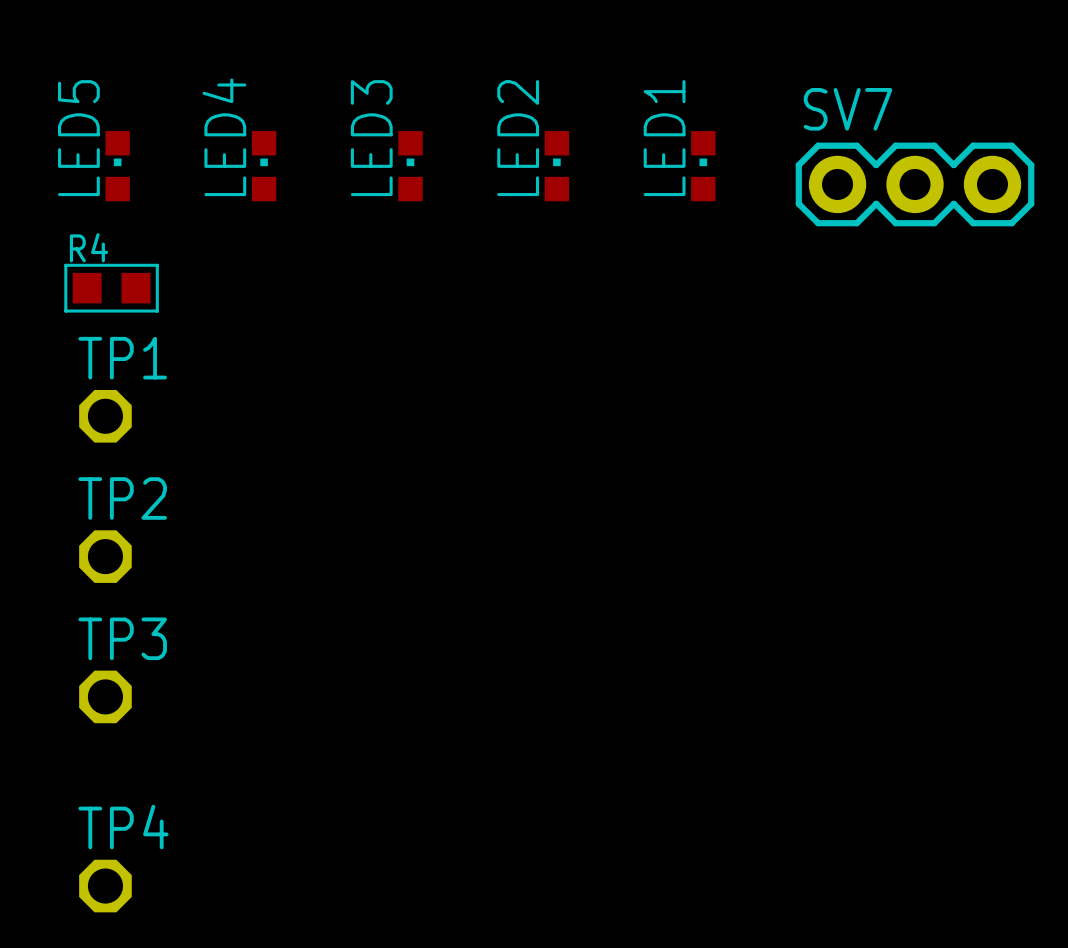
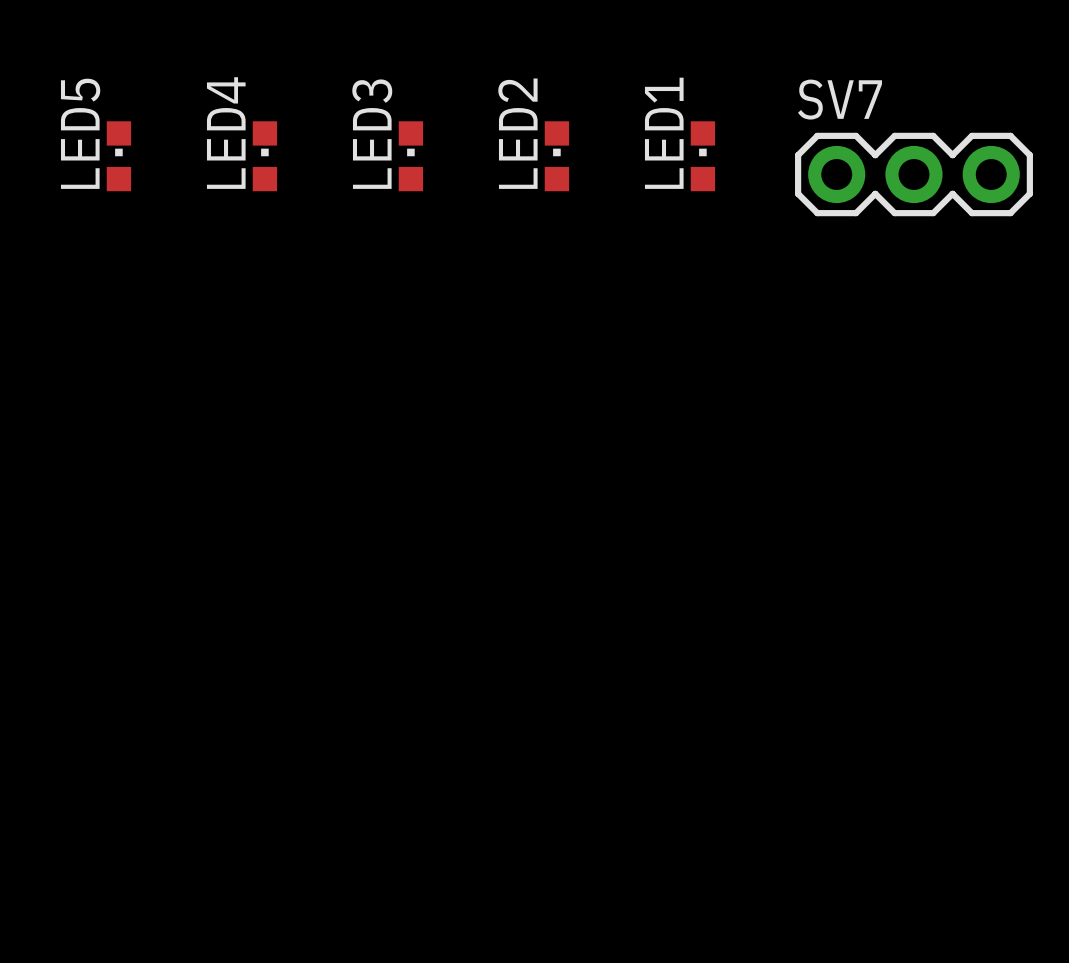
R4: (111, 288) -> none
TP1: (105, 416) -> none
TP2: (105, 556) -> none
TP3: (105, 696) -> none
TP4: (105, 886) -> none

